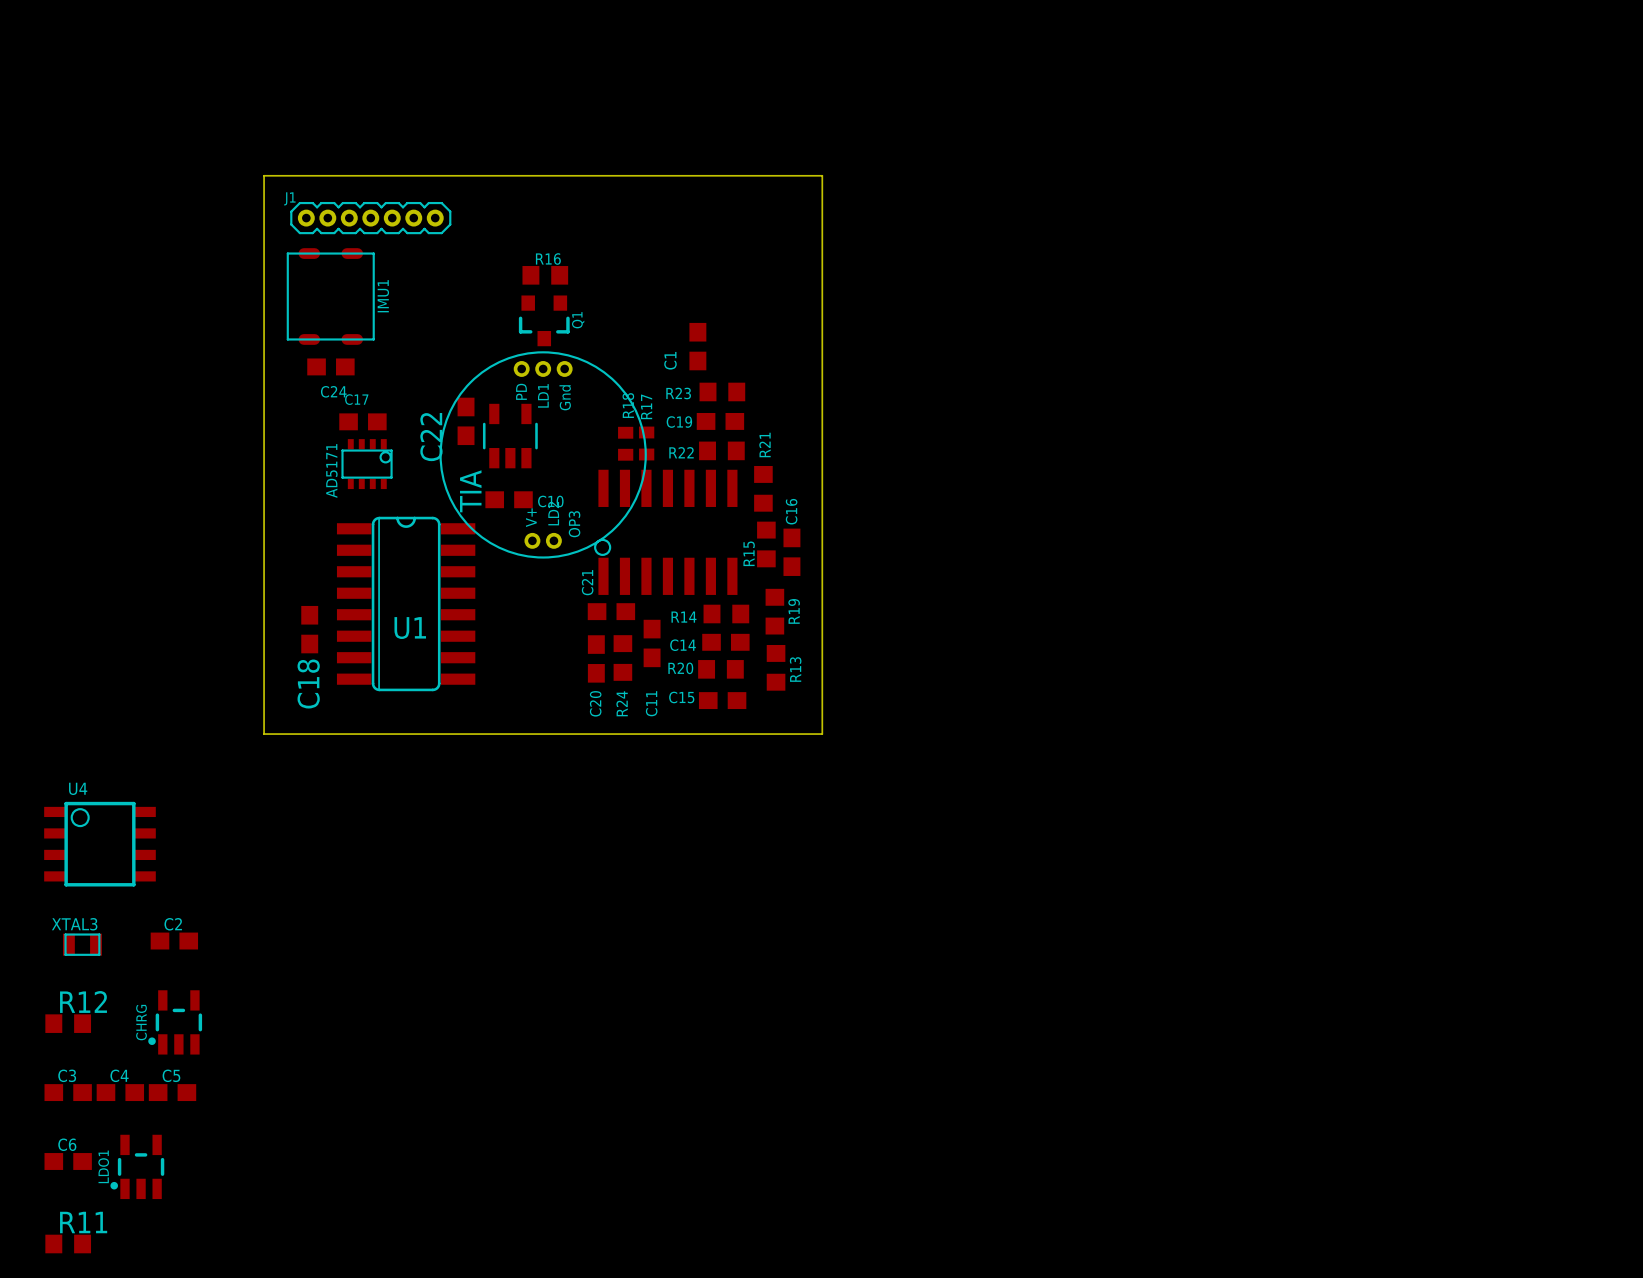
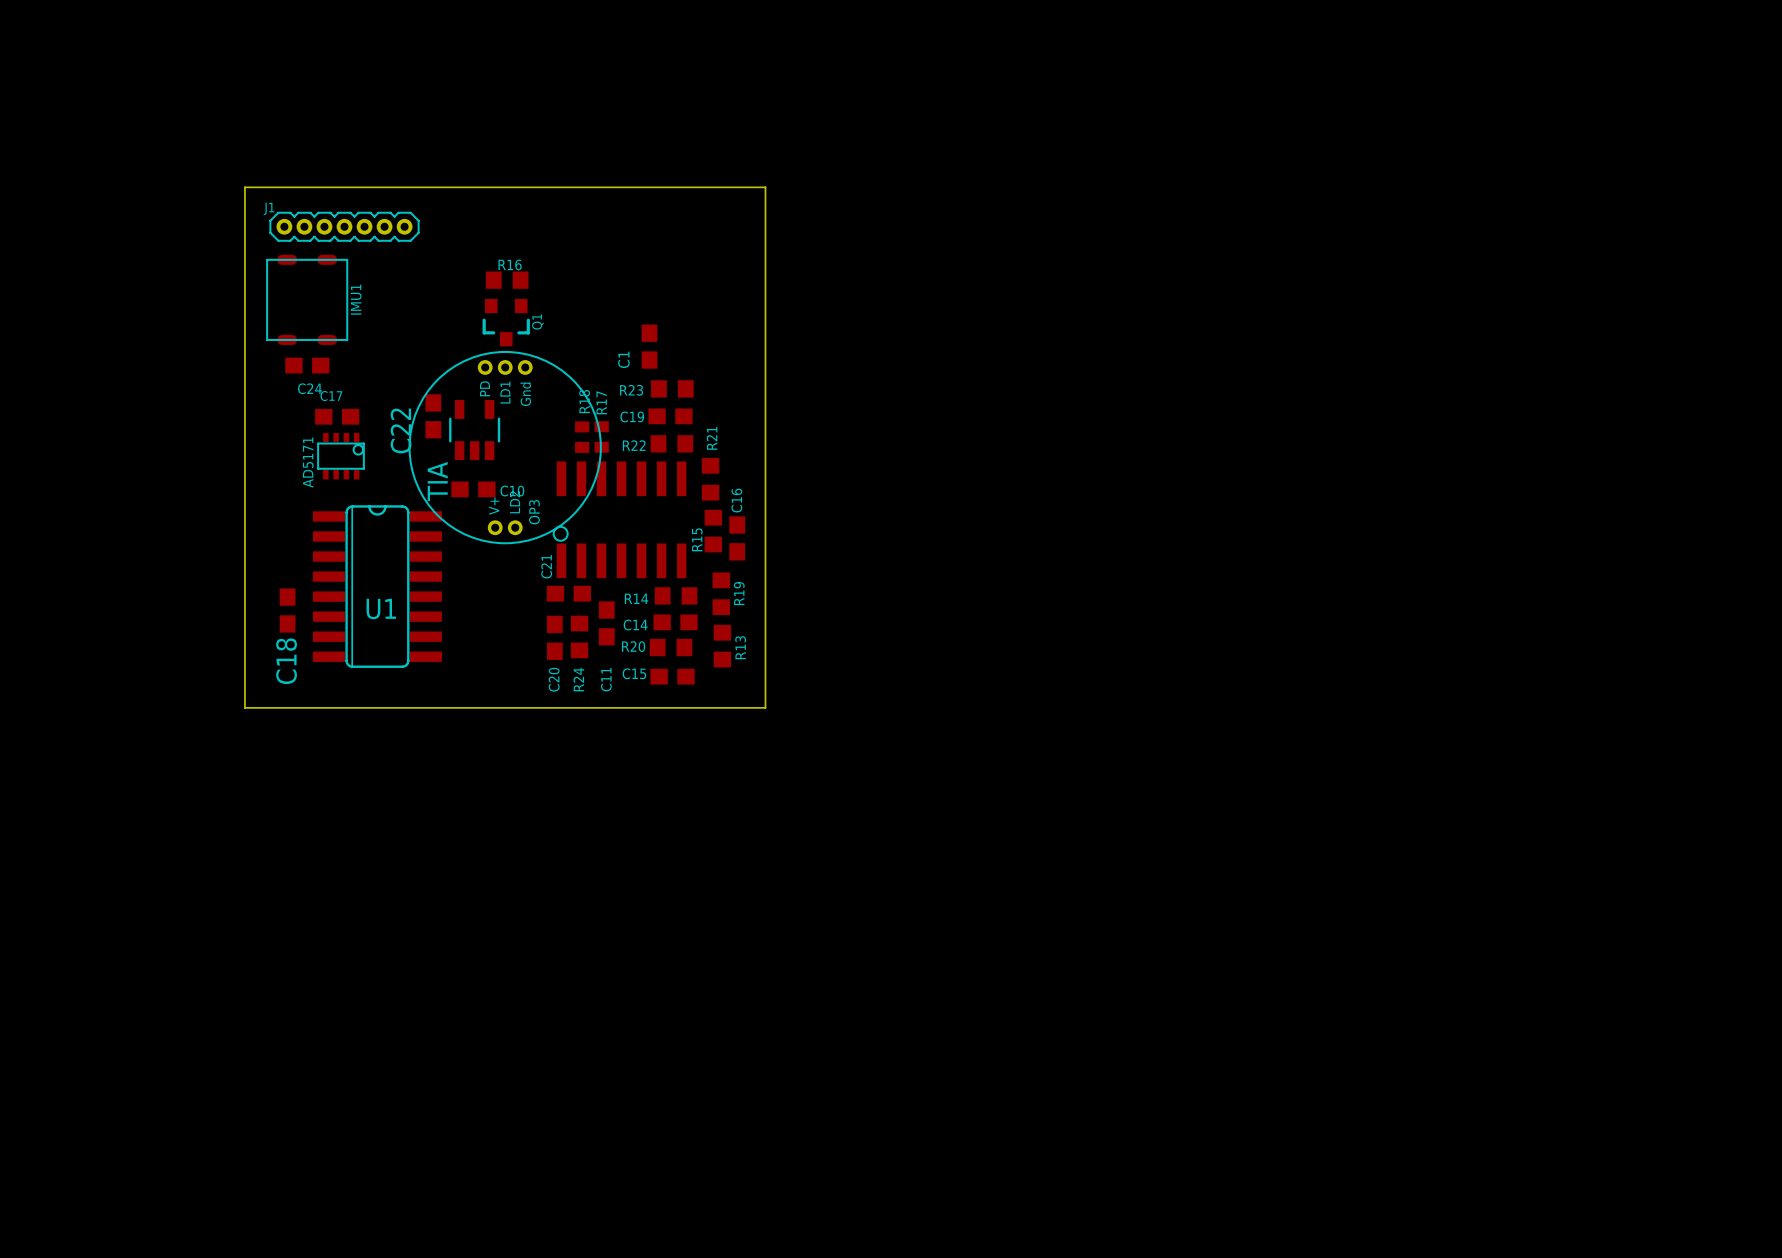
U4: (99, 844) -> none
C2: (174, 941) -> none
XTAL3: (82, 944) -> none
CHRG: (175, 1022) -> none
R12: (68, 1023) -> none
C3: (68, 1092) -> none
C4: (120, 1092) -> none
C5: (172, 1092) -> none
C6: (68, 1161) -> none
LDO1: (137, 1166) -> none
R11: (68, 1243) -> none

